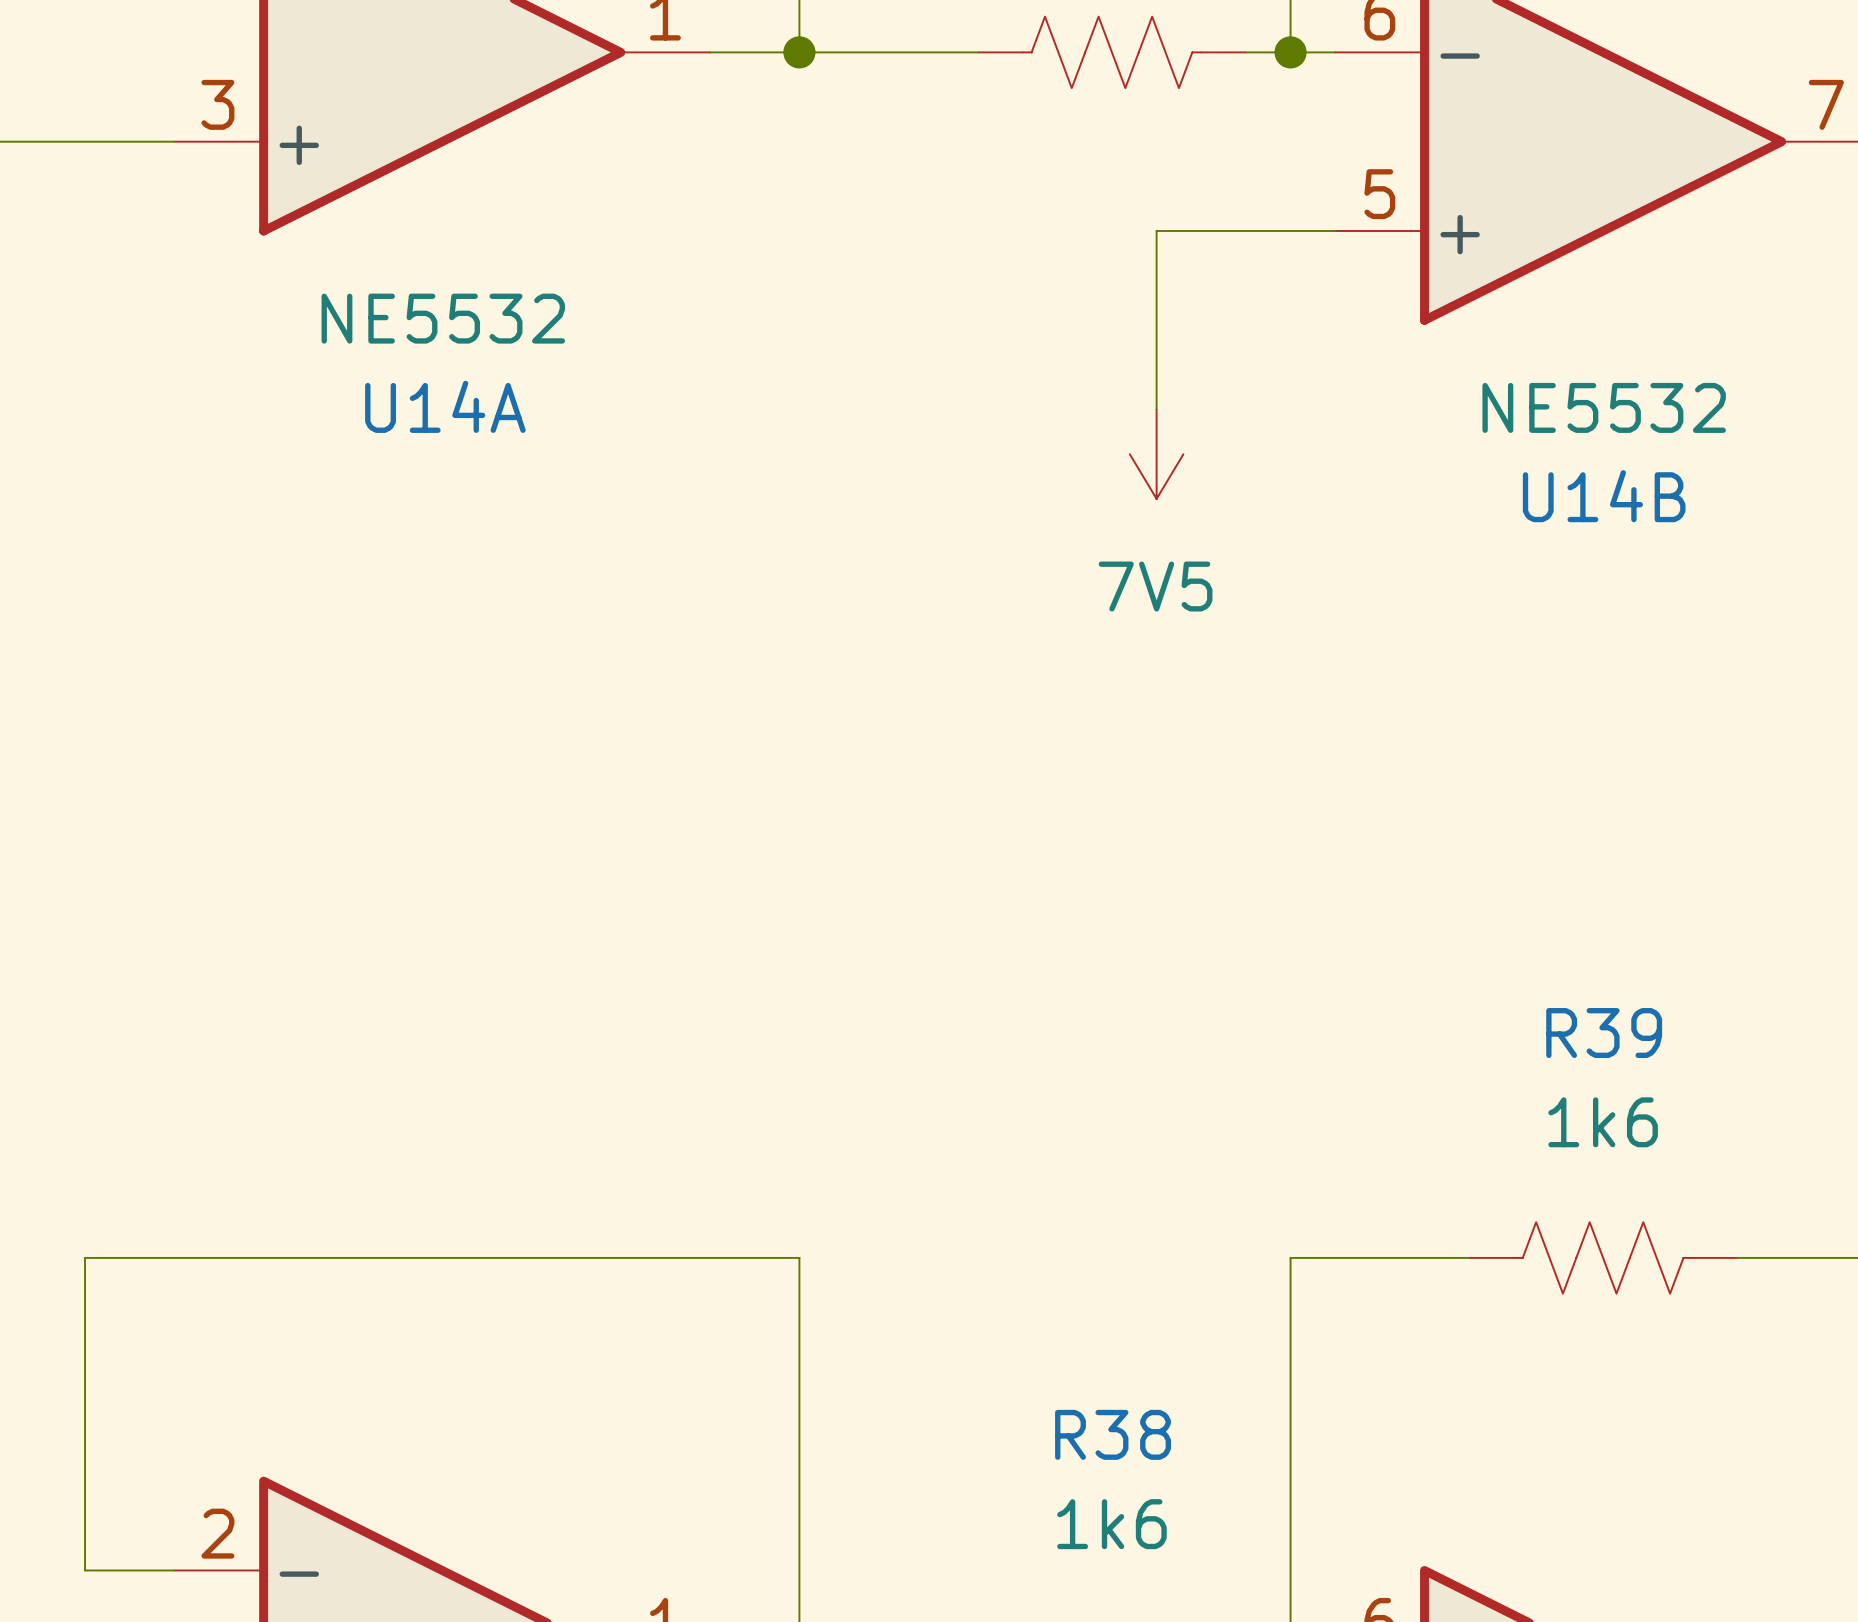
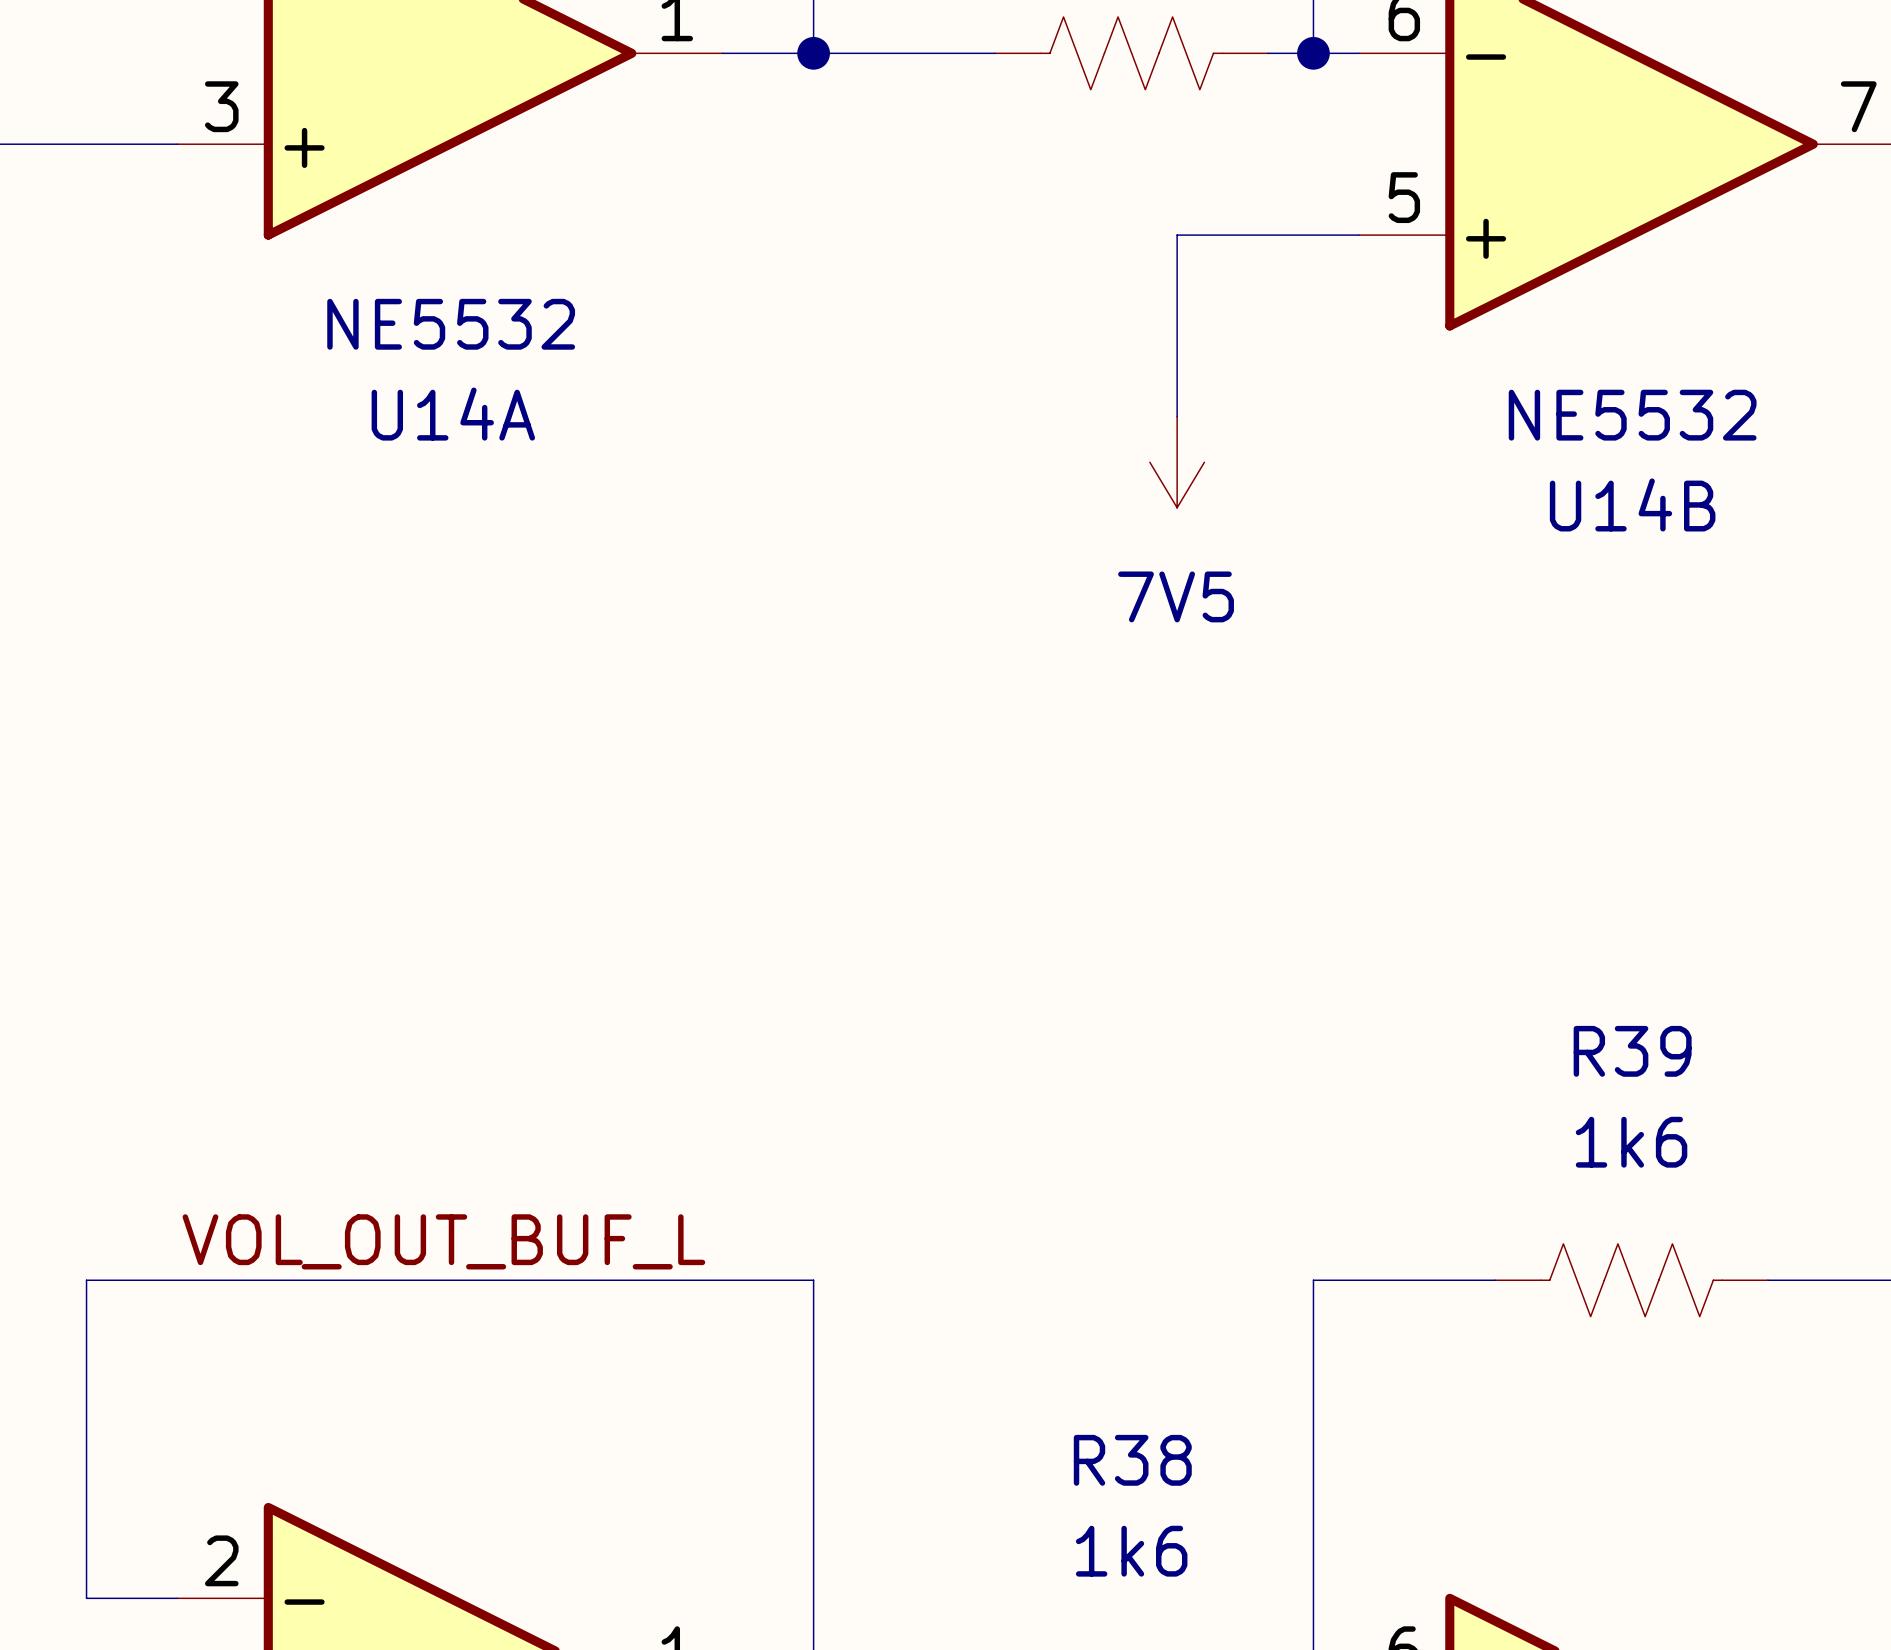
label: none -> VOL_OUT_BUF_L (443, 1241)

